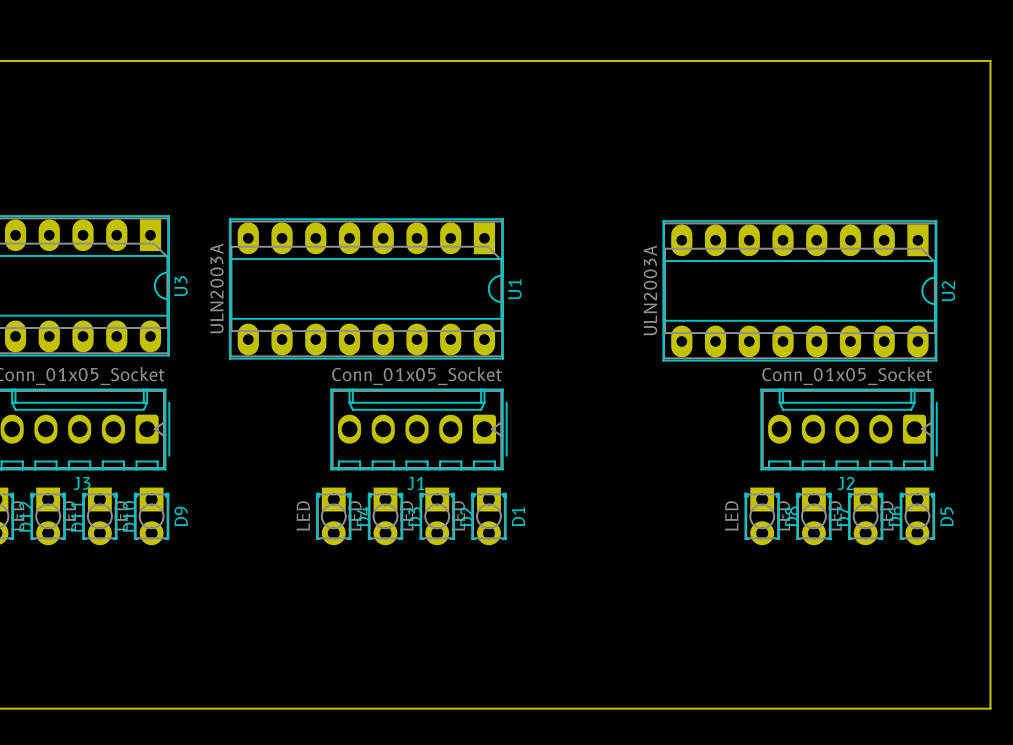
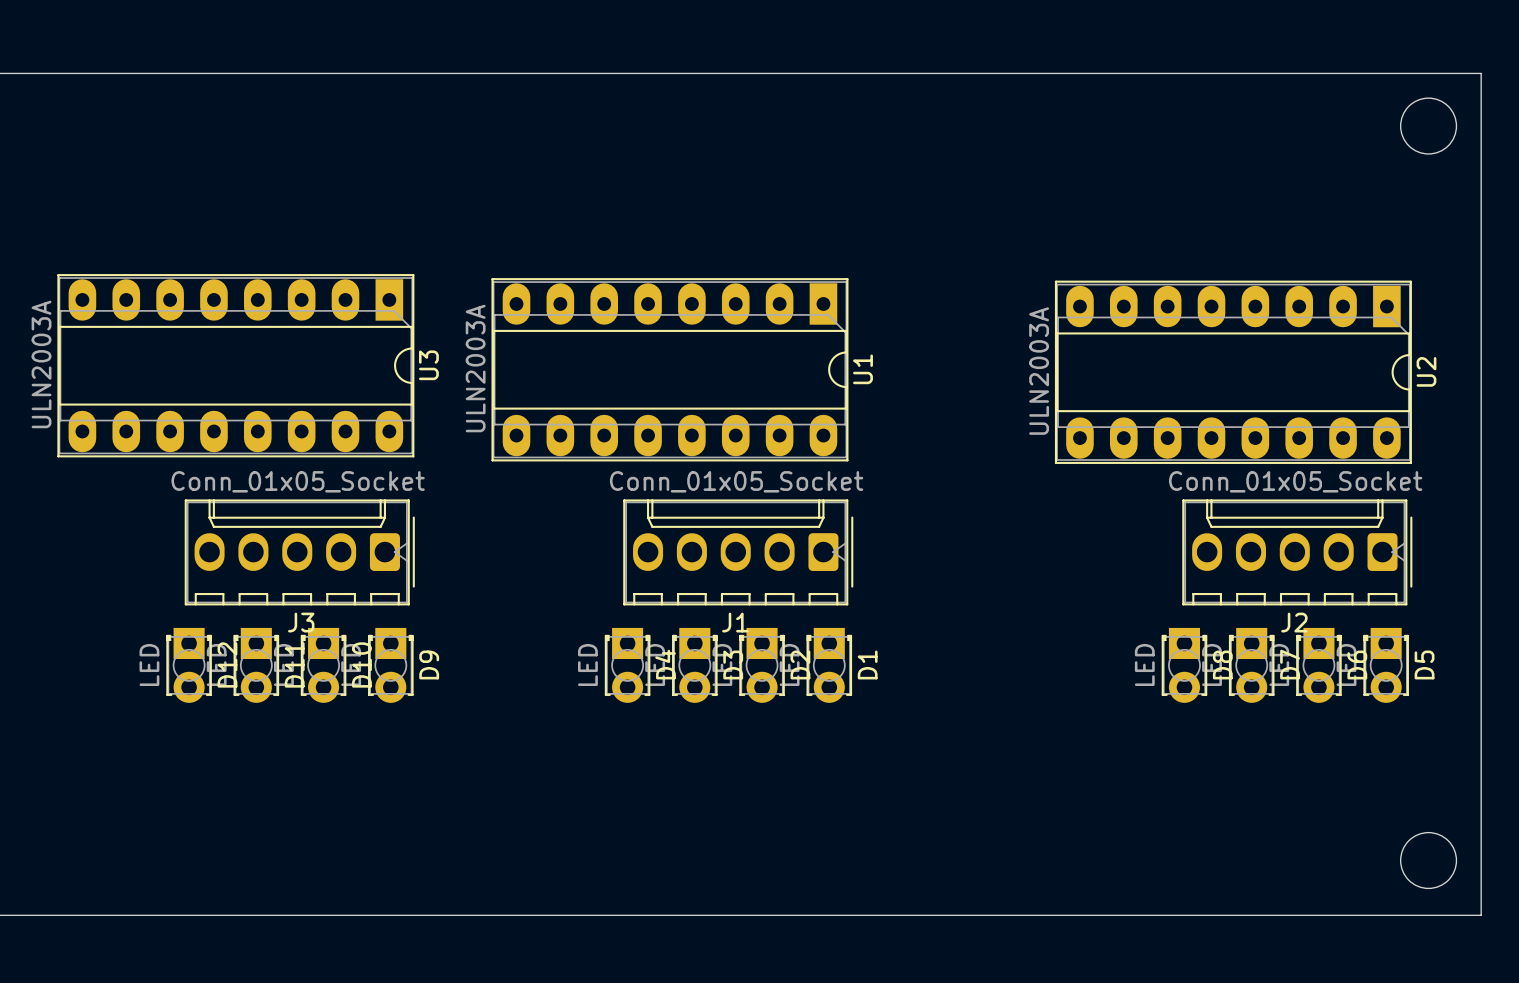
round board edge: none -> [1400, 97, 1457, 155]
round board edge: none -> [1400, 832, 1457, 889]

